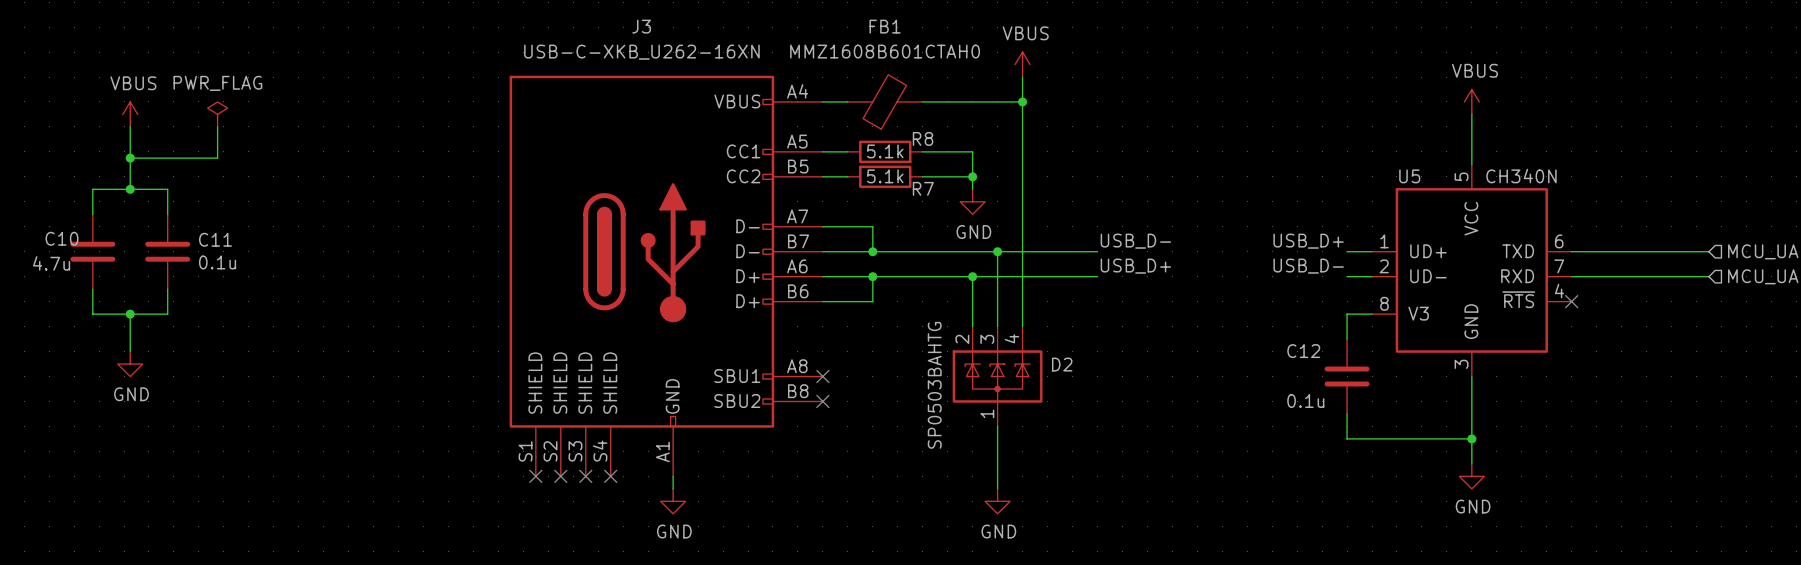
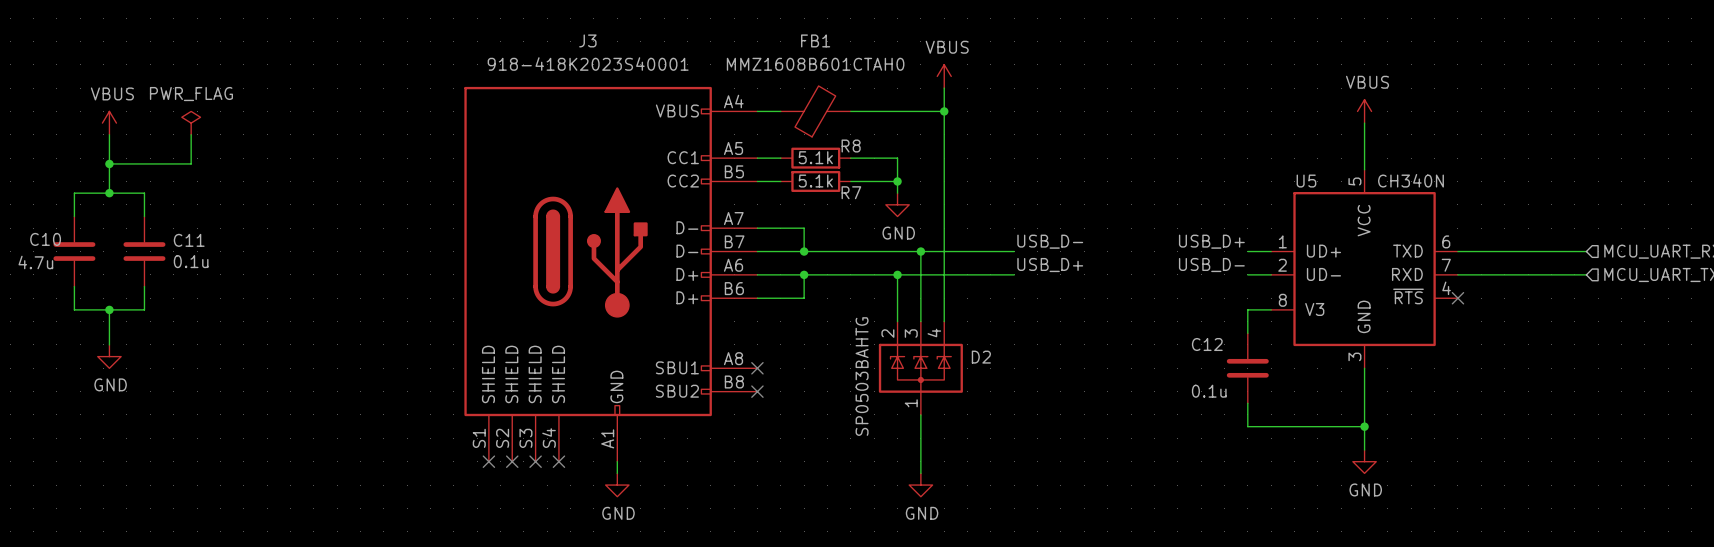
J3 value: USB-C-XKB_U262-16XN (641, 52) -> 918-418K2023S40001 (588, 64)

